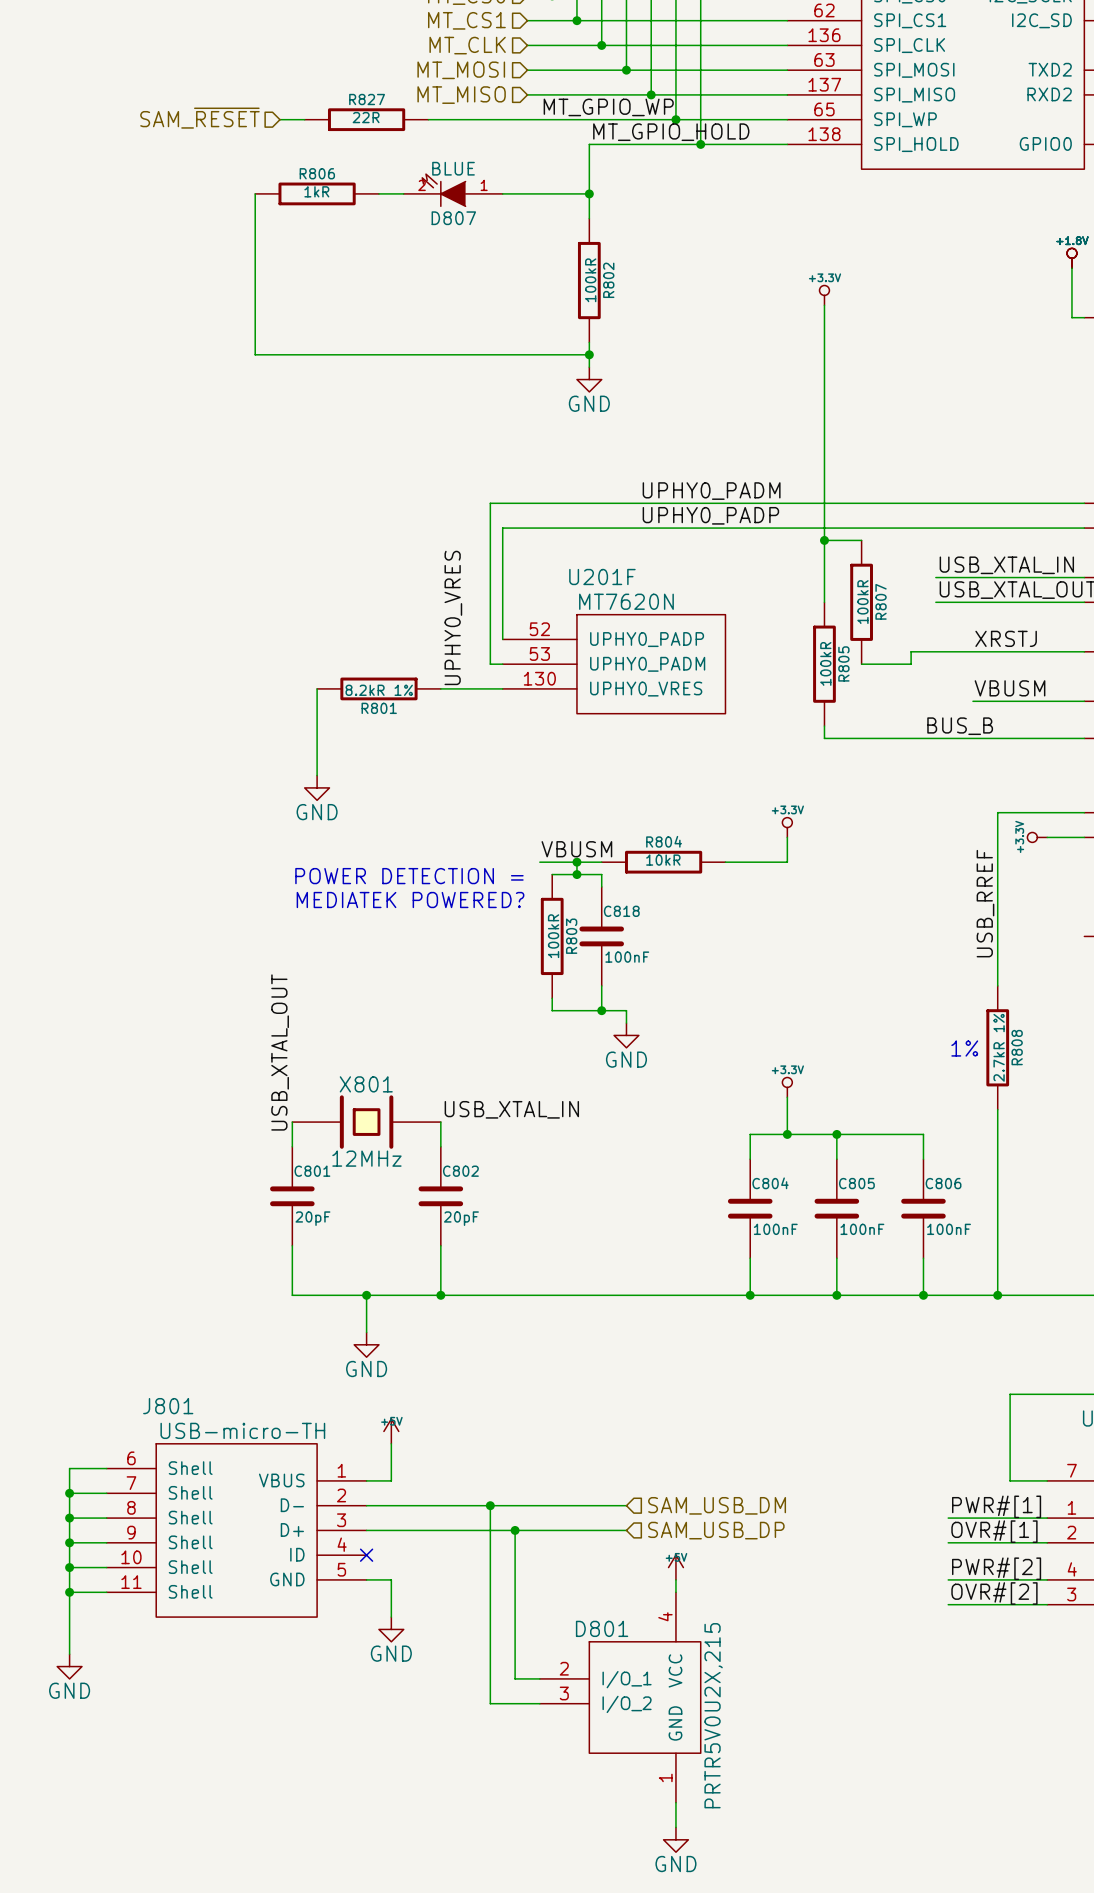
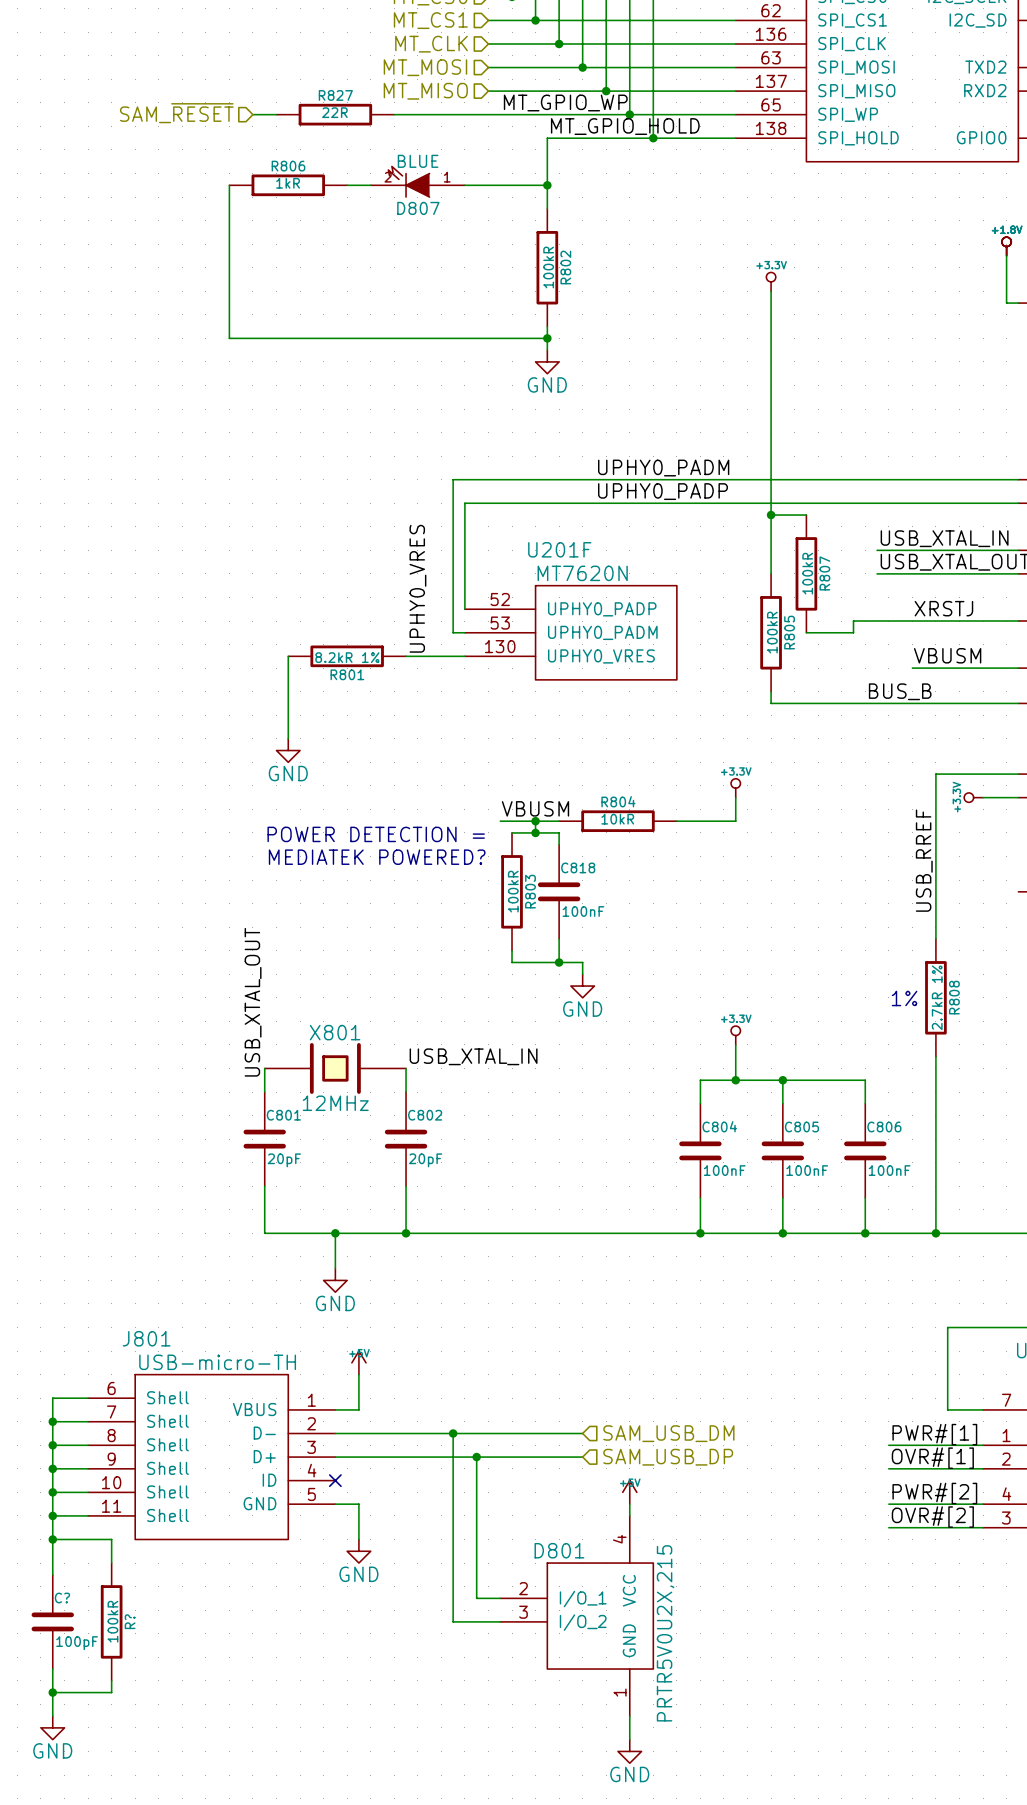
wire: none -> (52, 1539) (111, 1539) (111, 1563)
junction: none -> (52, 1539)
power symbol position: GND (69, 1666) -> GND (52, 1727)
C?: none -> 100pF (52, 1621)
R?: none -> 100kR (111, 1621)
wire: none -> (52, 1669) (52, 1716)
wire: none -> (111, 1680) (111, 1692) (52, 1692)
junction: none -> (52, 1692)

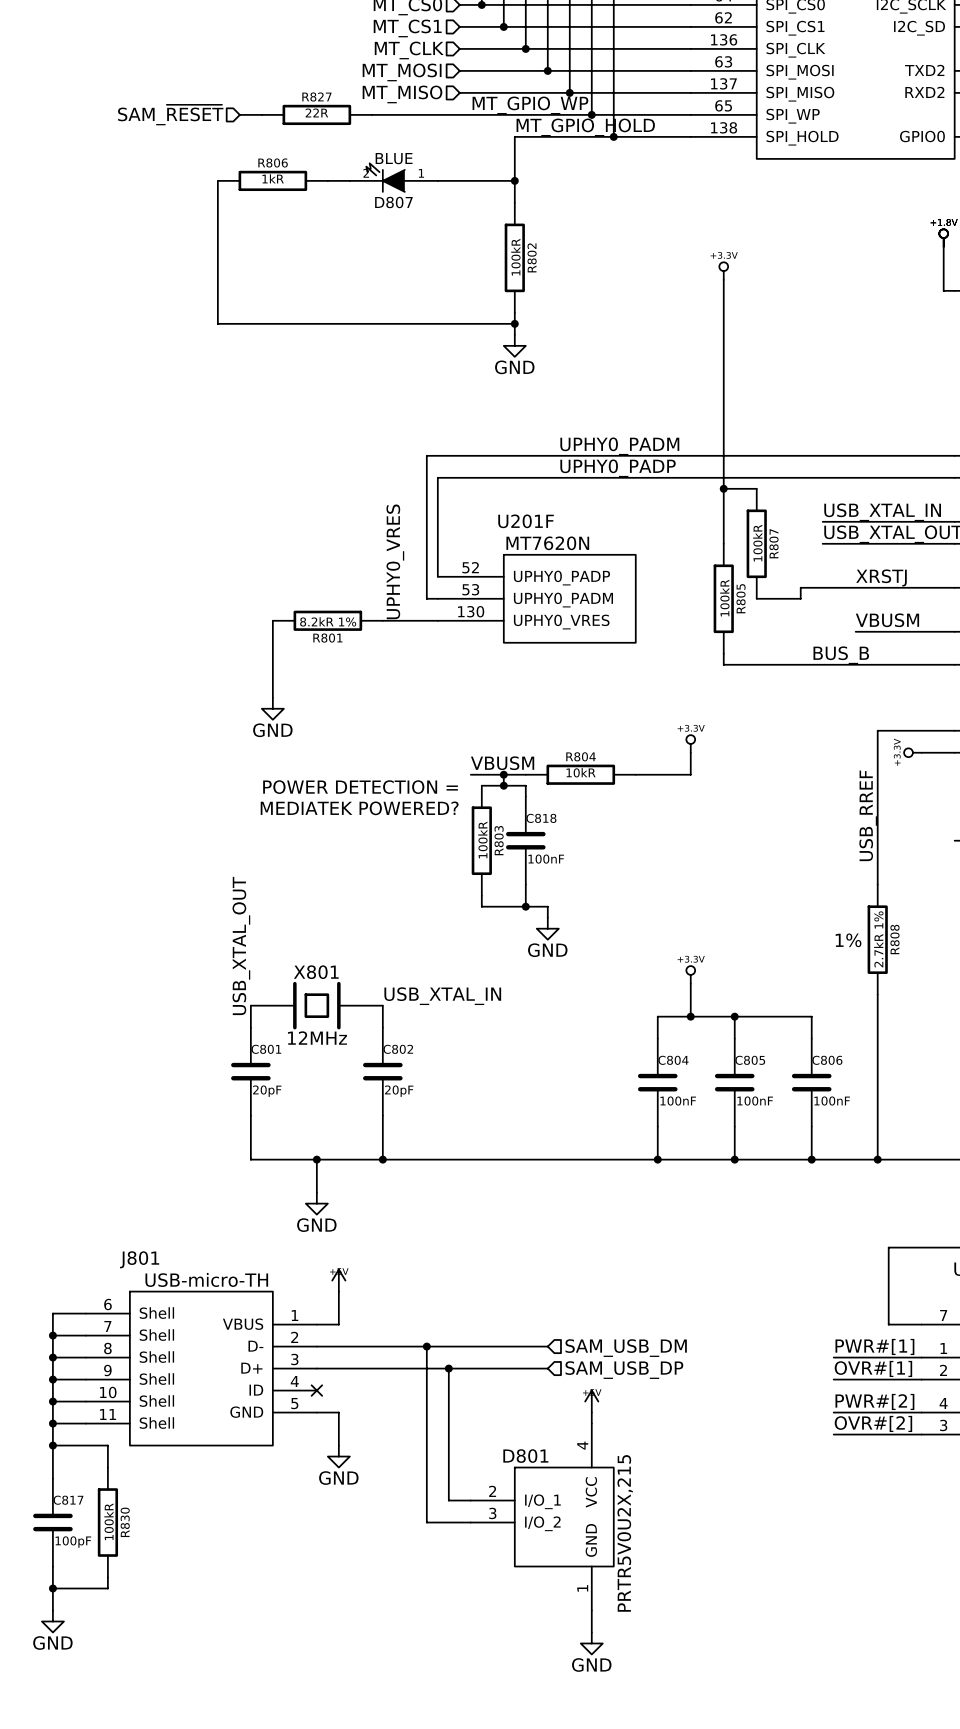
C? name: C? (62, 1598) -> C817 (68, 1500)
R? name: R? (130, 1621) -> R830 (125, 1522)

